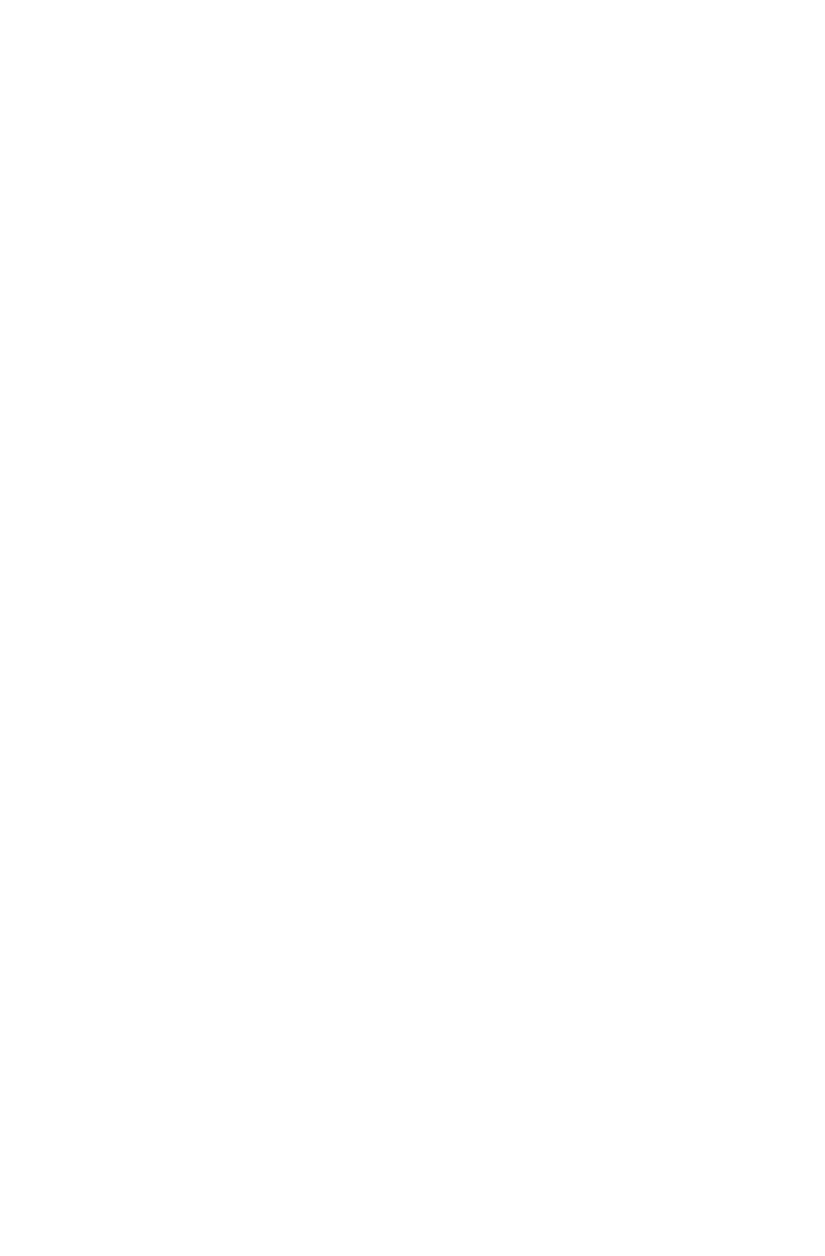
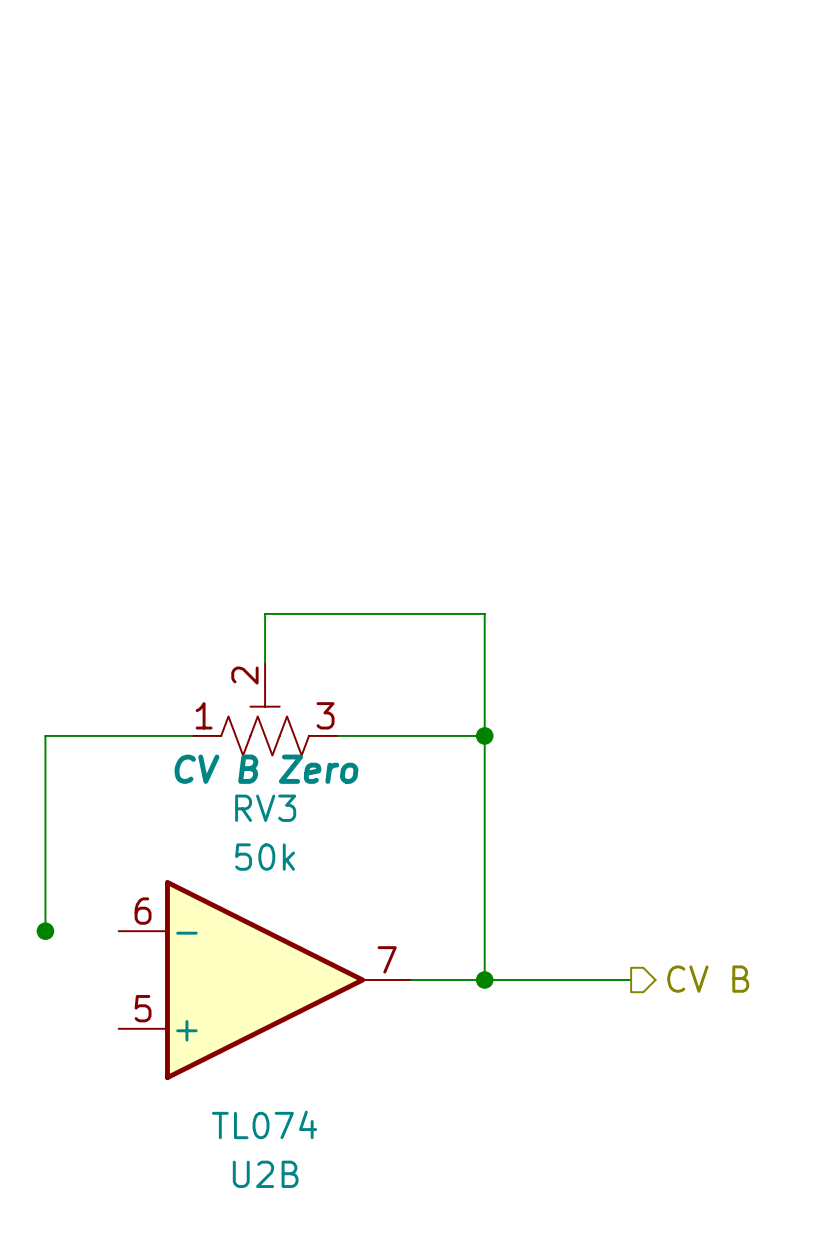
wire: none -> (265, 662) (265, 613) (484, 613) (484, 980)
RV3: none -> 50k (265, 709)
wire: none -> (191, 735) (45, 735) (45, 931)
wire: none -> (338, 735) (484, 735)
junction: none -> (484, 735)
junction: none -> (45, 931)
hierarchical label: none -> CV B (708, 979)
U2B: none -> TL074 (265, 980)
wire: none -> (411, 980) (631, 980)
junction: none -> (484, 980)

